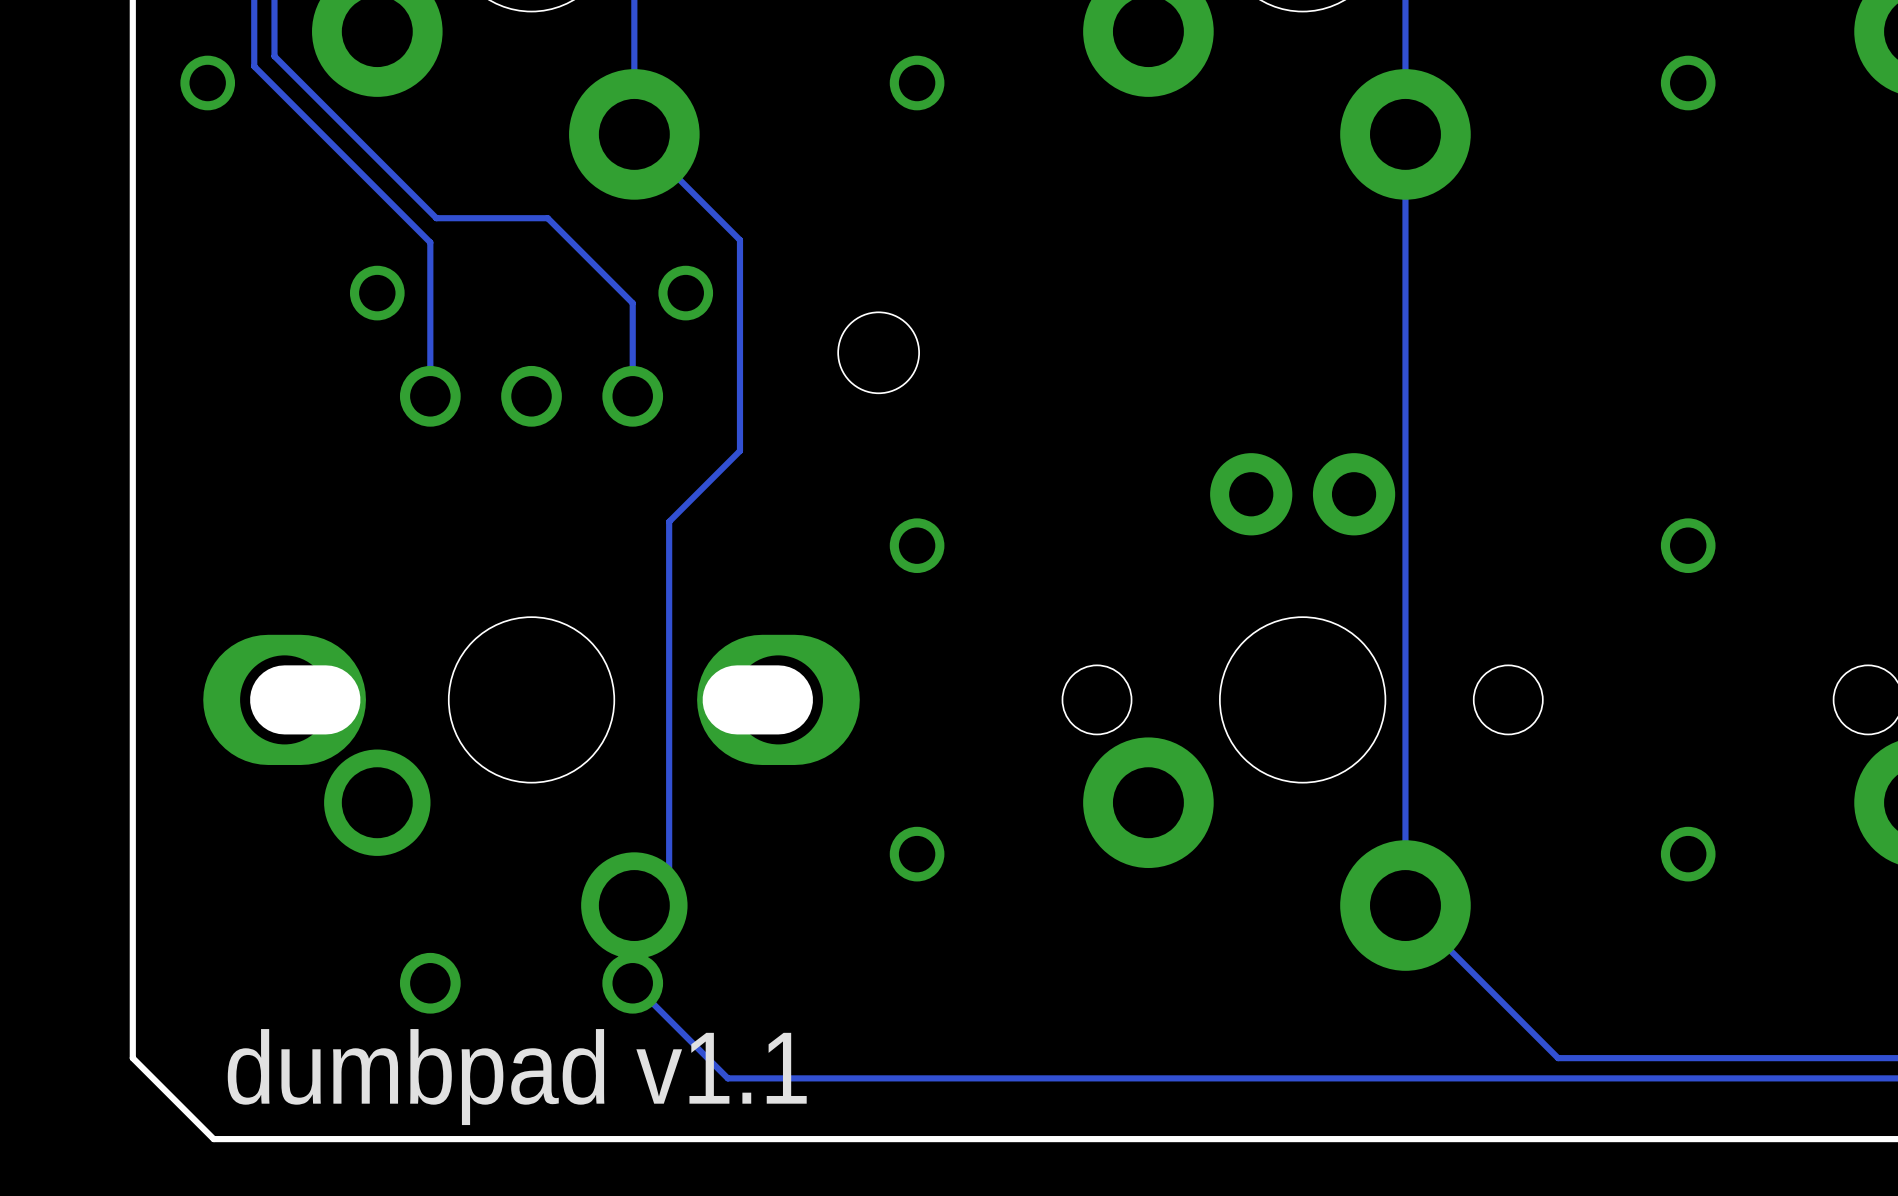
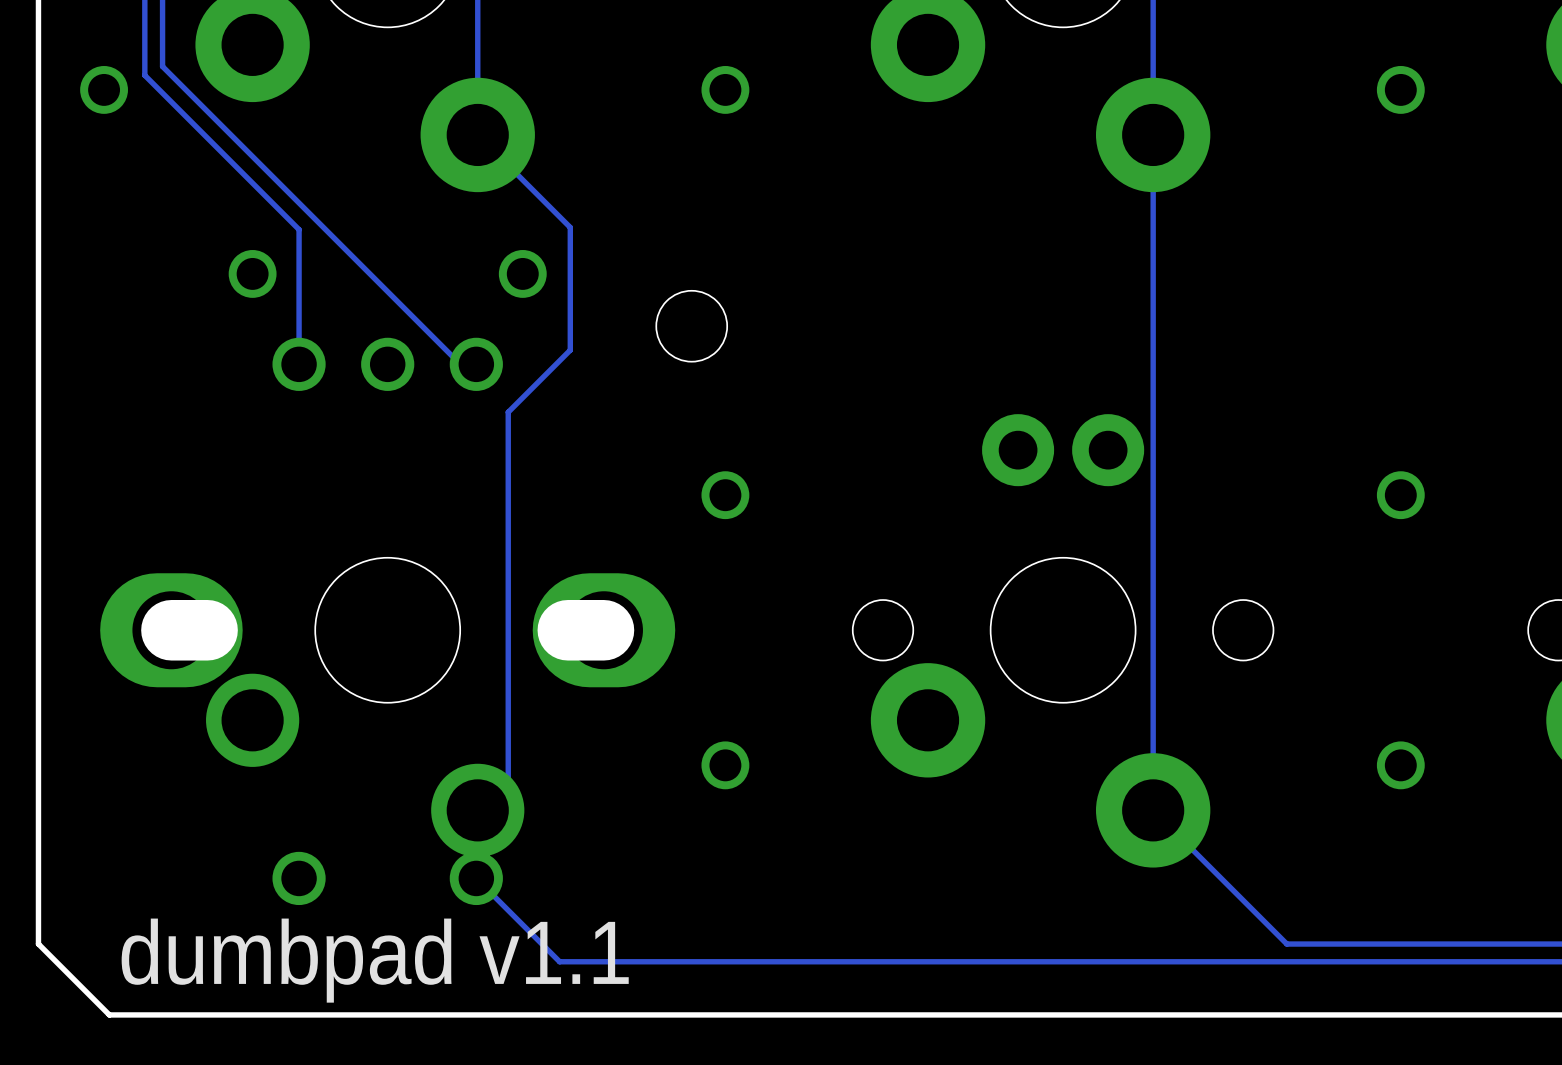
track: (436, 218) (547, 218) (632, 303) (632, 396) -> (304, 208) (460, 364) (476, 364)
track: (739, 380) (739, 450) (669, 521) -> (570, 350) (508, 412) (508, 474)

